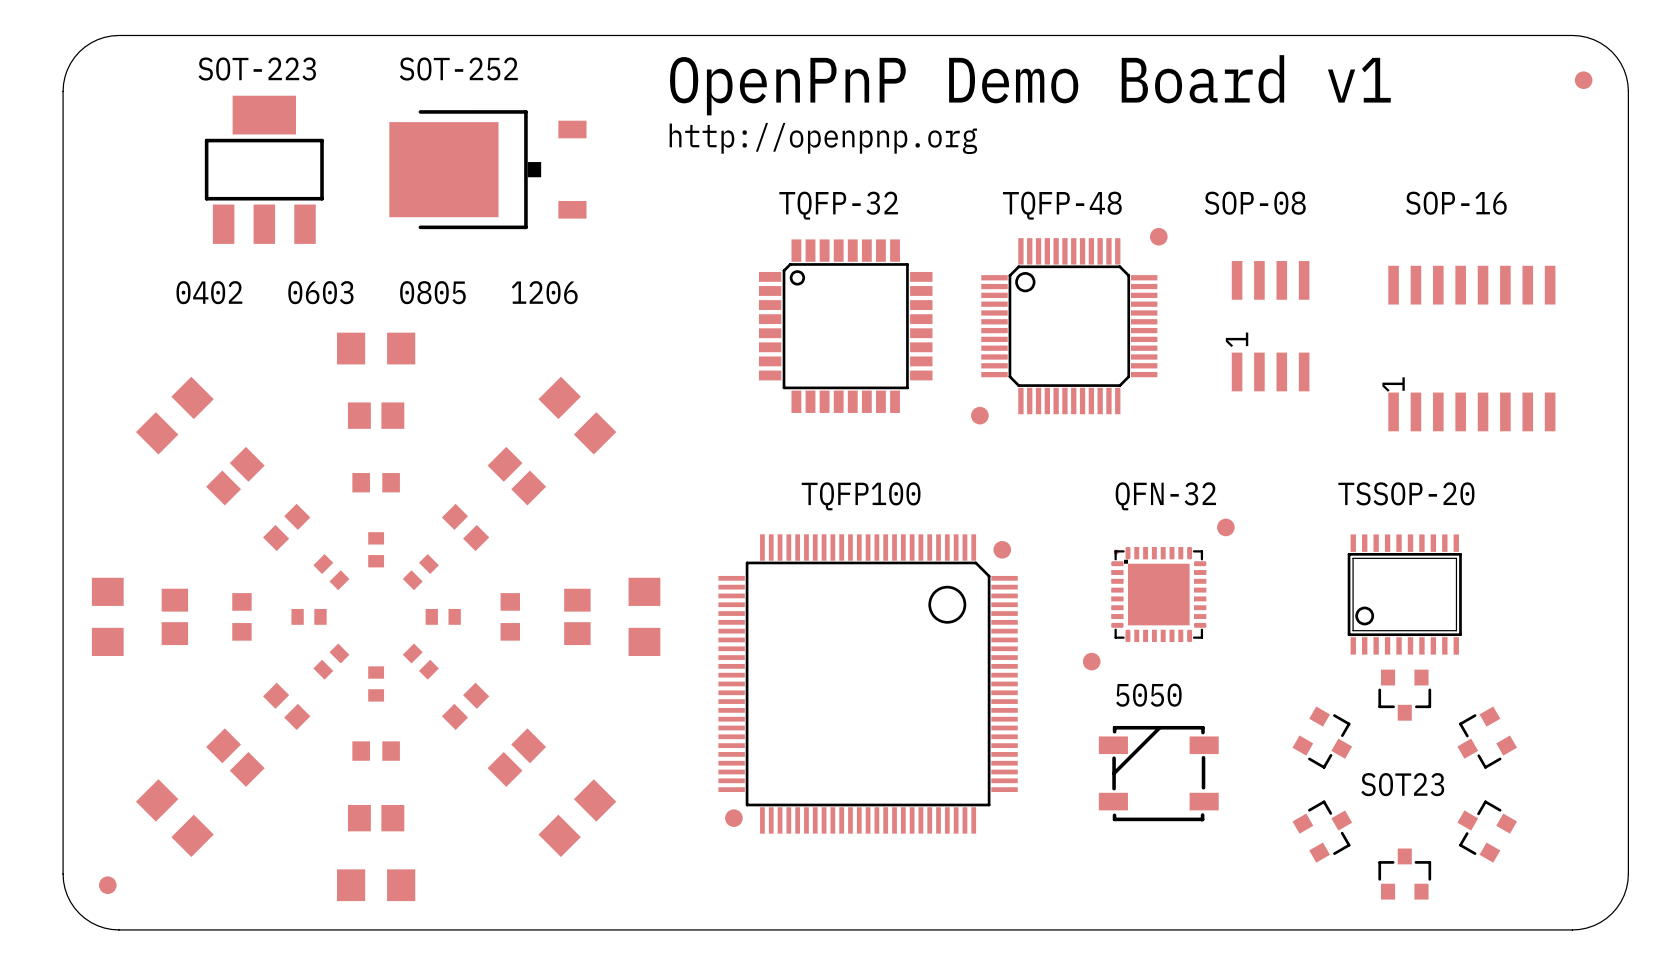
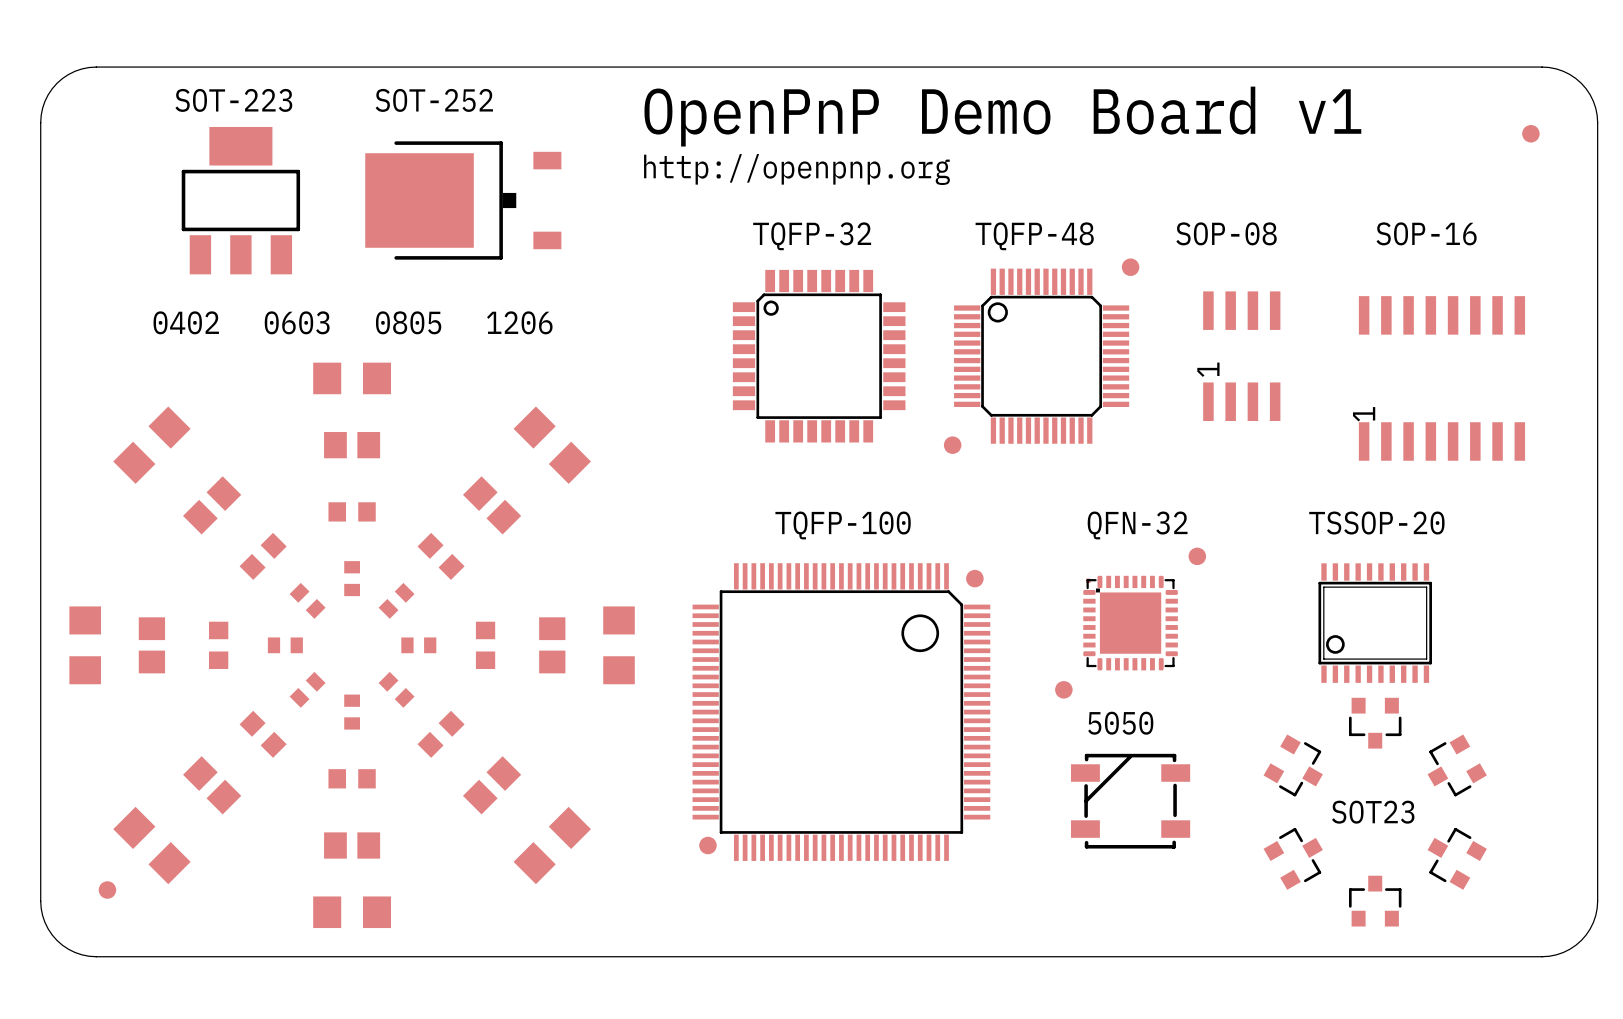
part position: (1583, 80) -> (1530, 133)
text: TQFP100 (861, 496) -> TQFP-100 (843, 525)
part position: (107, 885) -> (107, 890)

